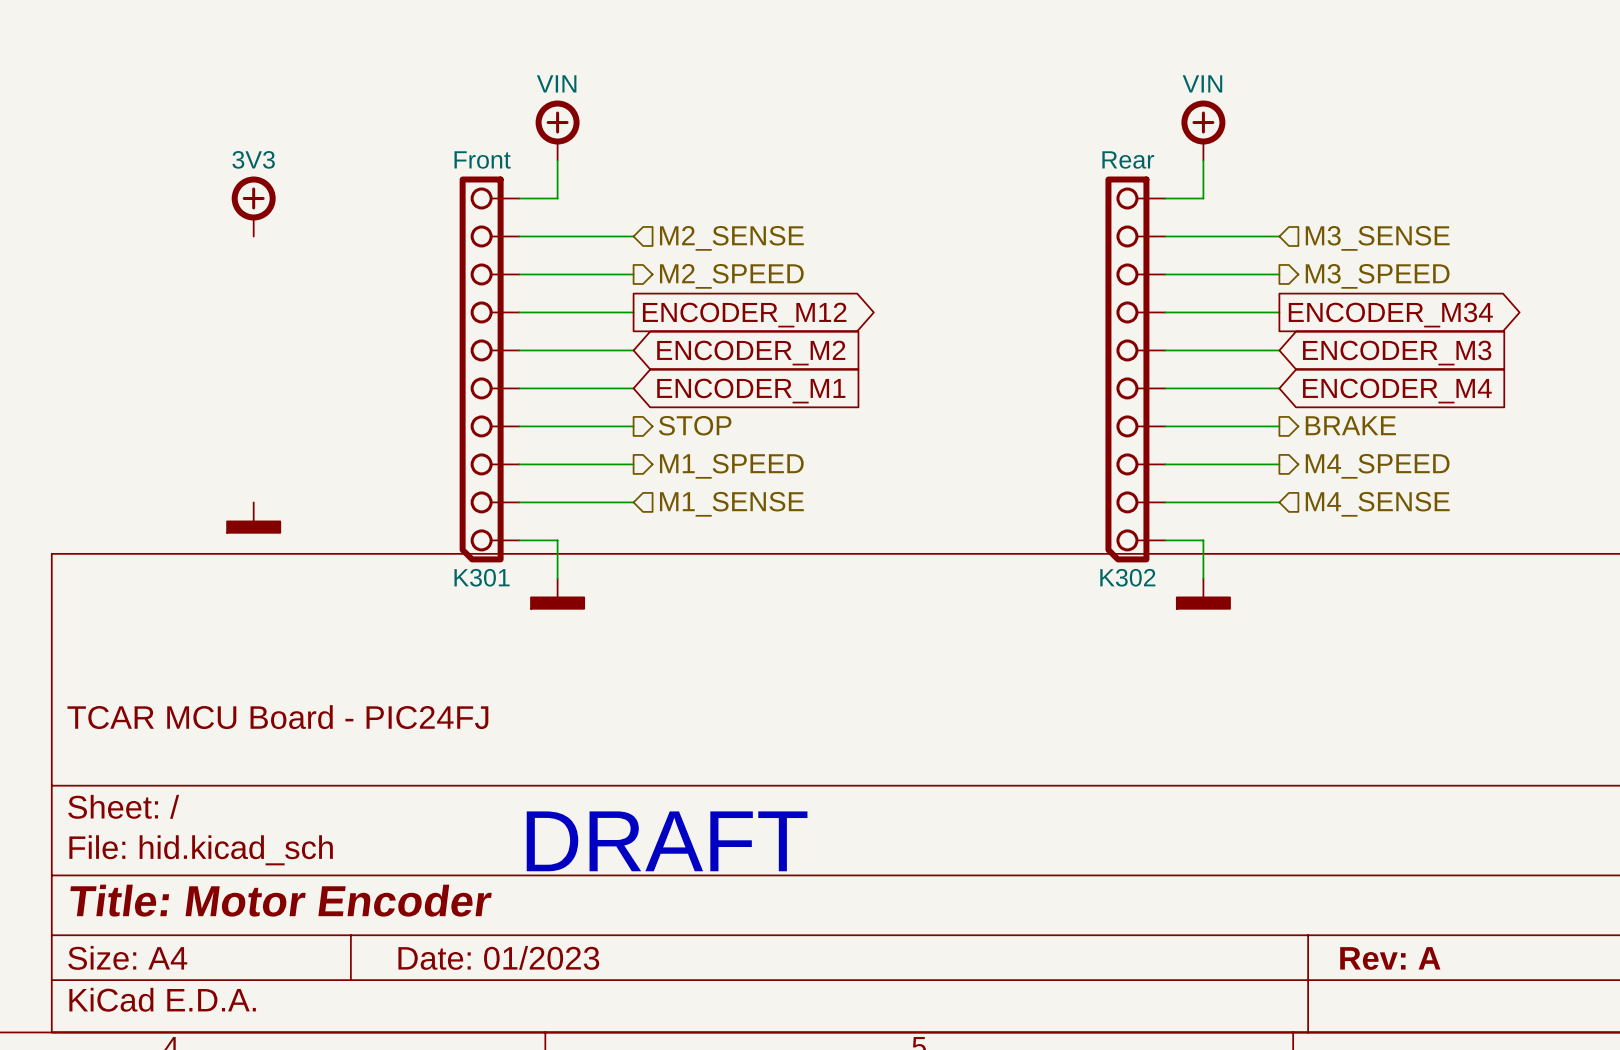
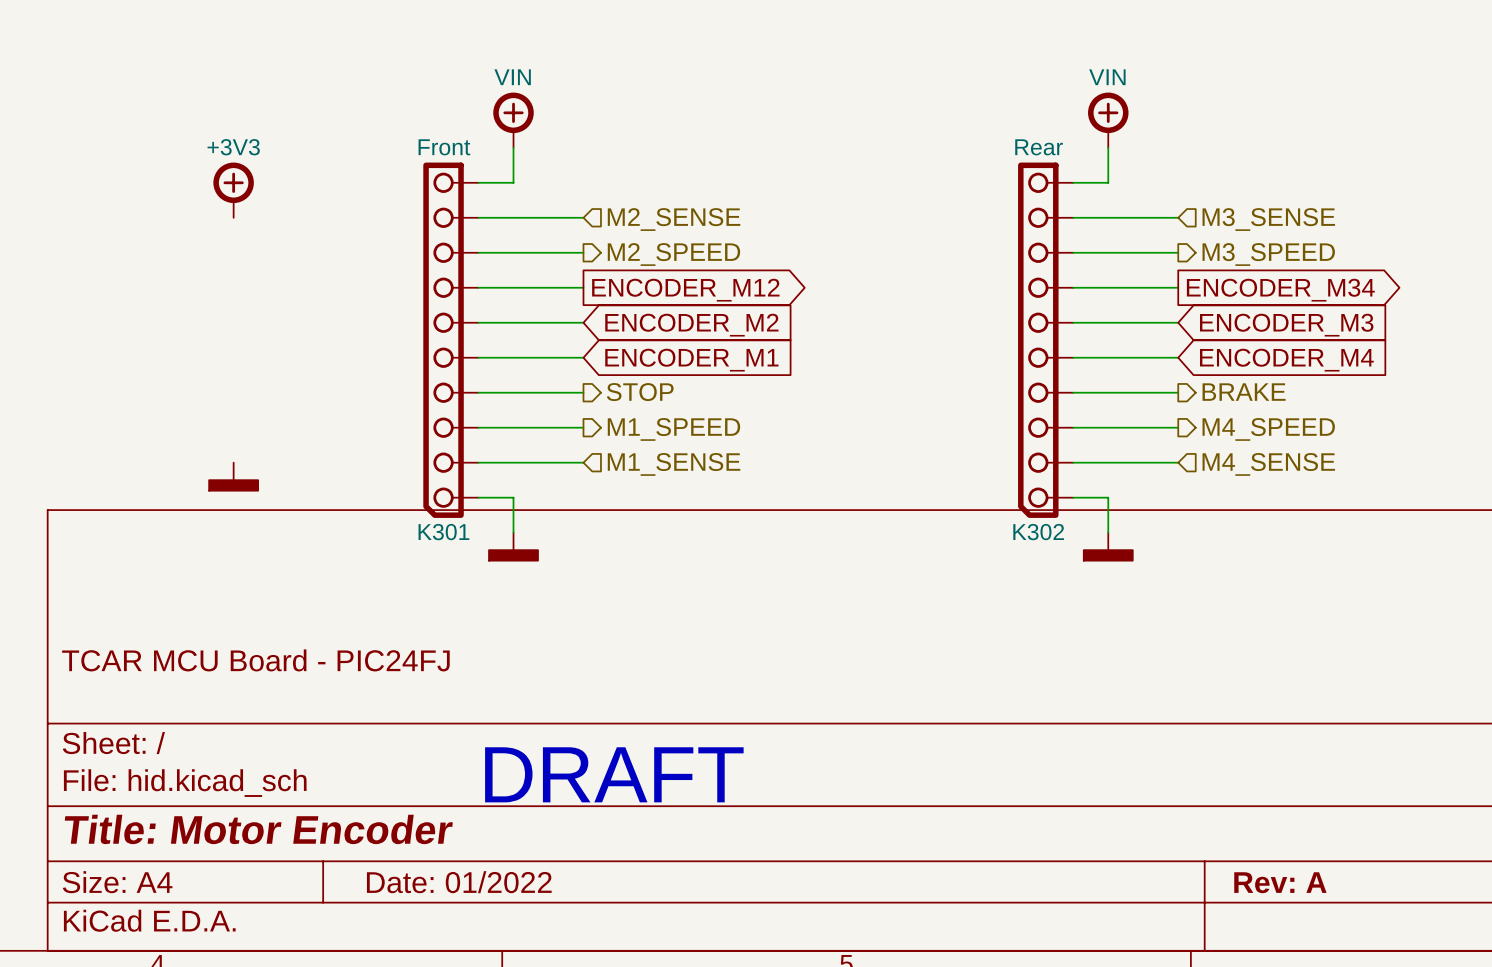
power symbol text: 3V3 (253, 159) -> +3V3 (233, 147)
title block: Date: 01/2023 (498, 957) -> Date: 01/2022 (459, 882)

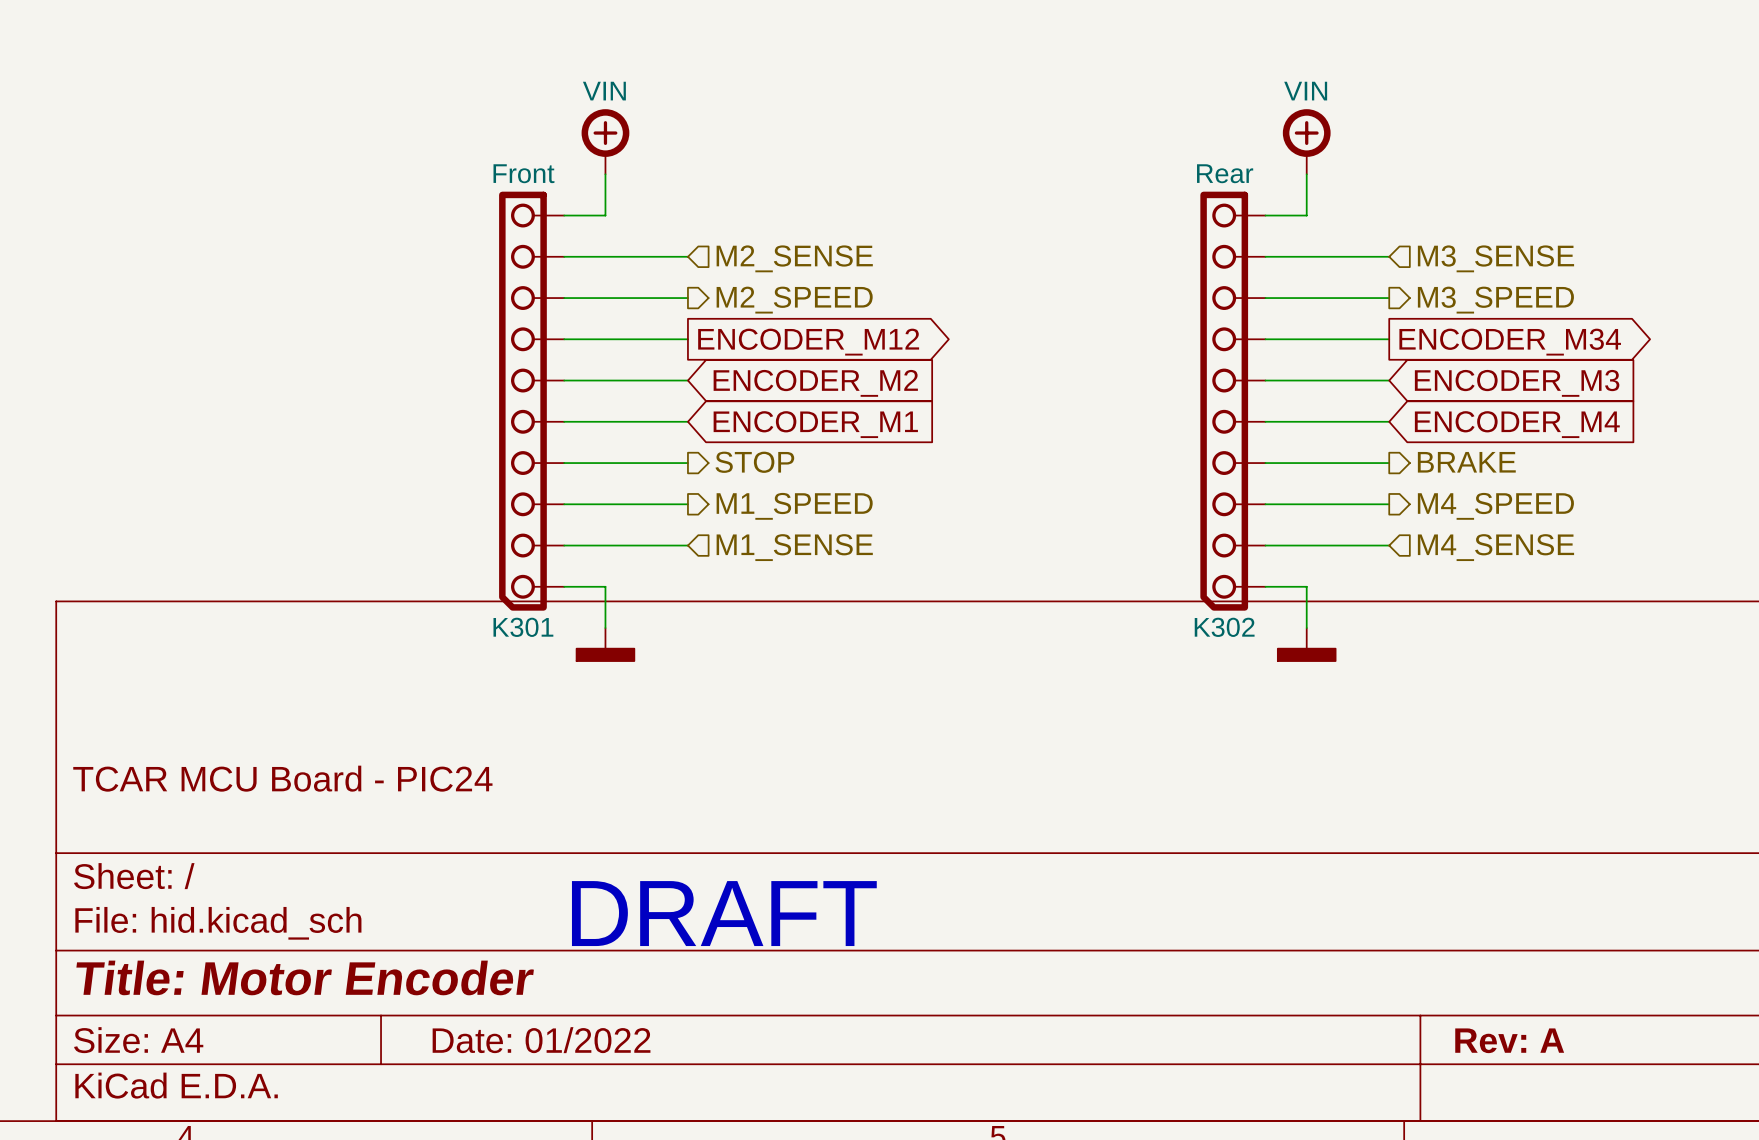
power symbol: (233, 190) -> none
power symbol: (233, 476) -> none
title block: TCAR MCU Board - PIC24FJ (255, 660) -> TCAR MCU Board - PIC24 (282, 778)

